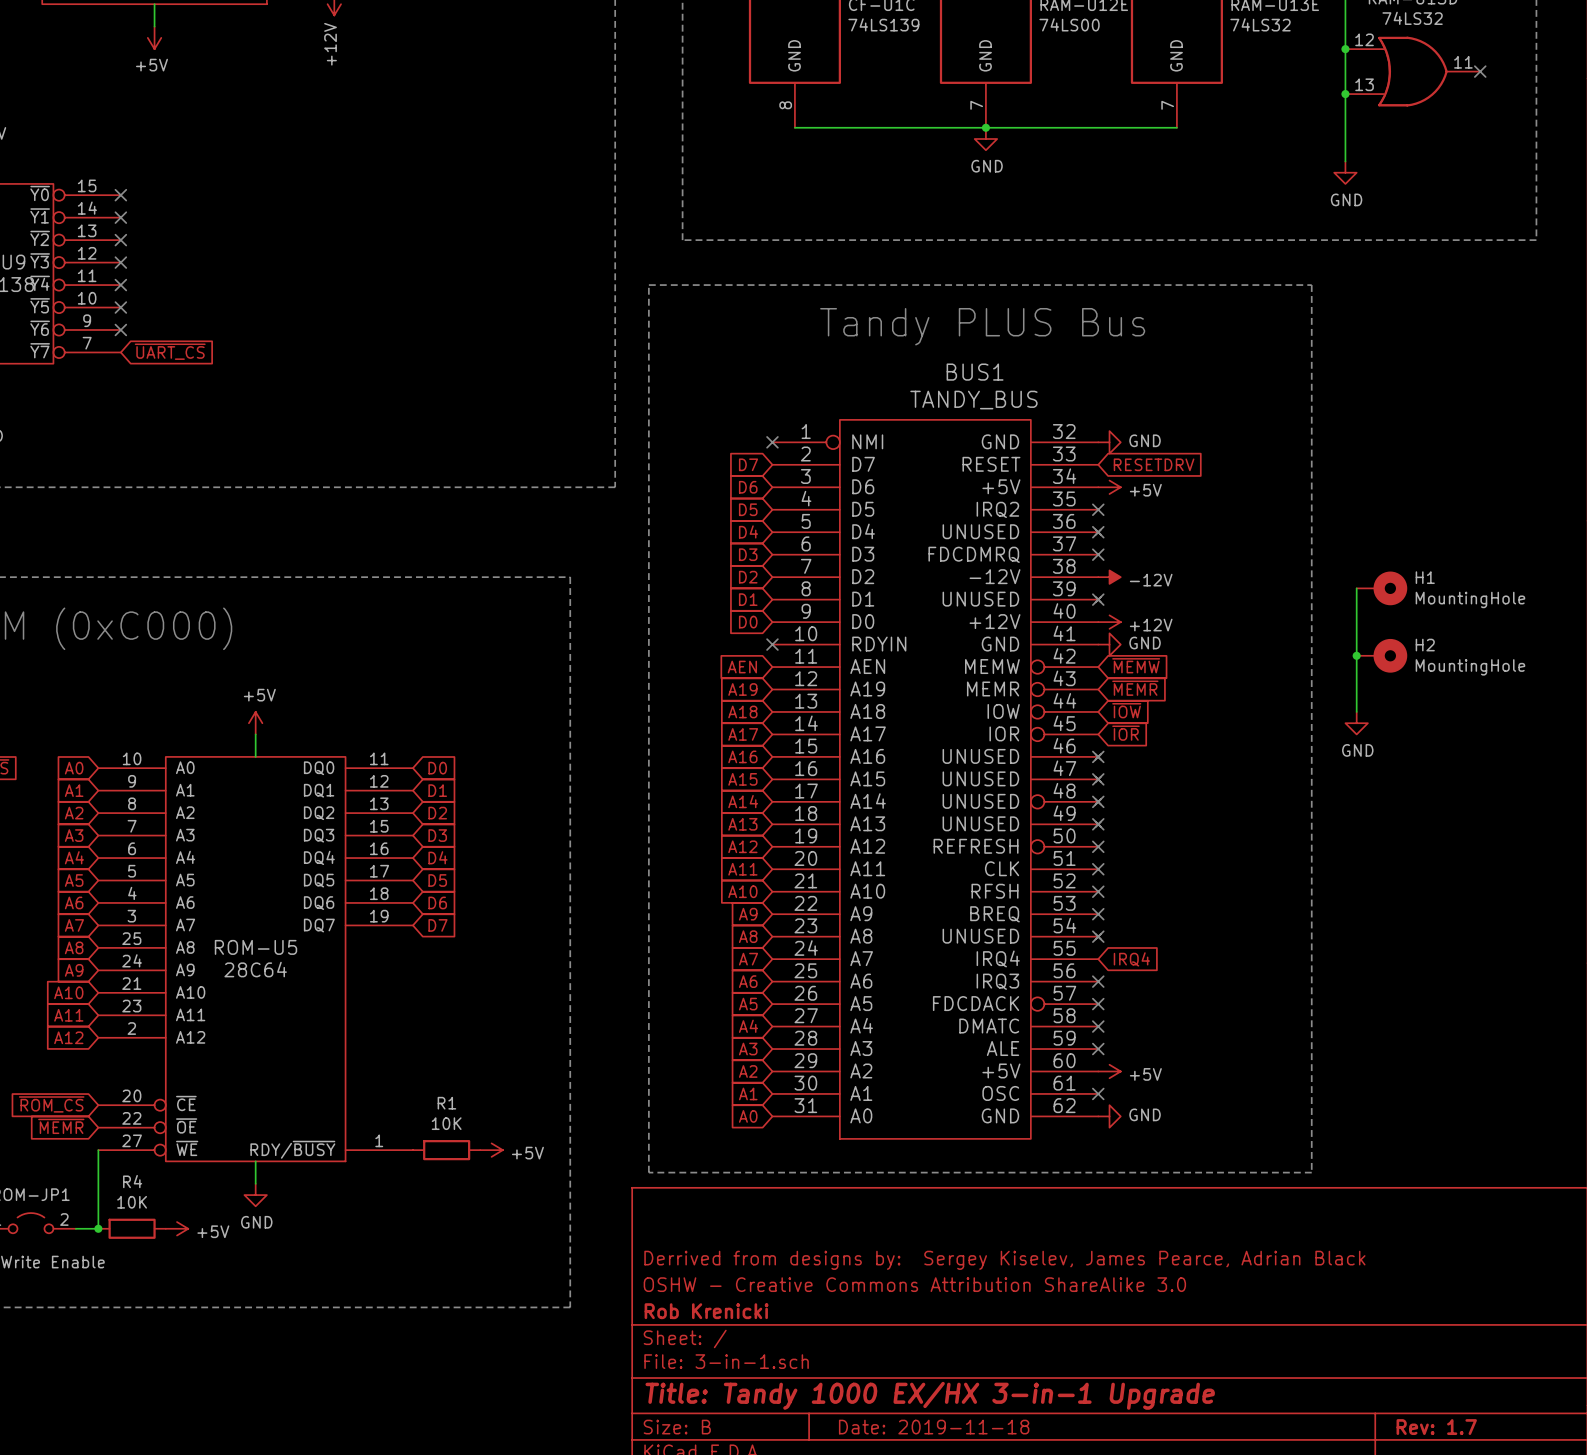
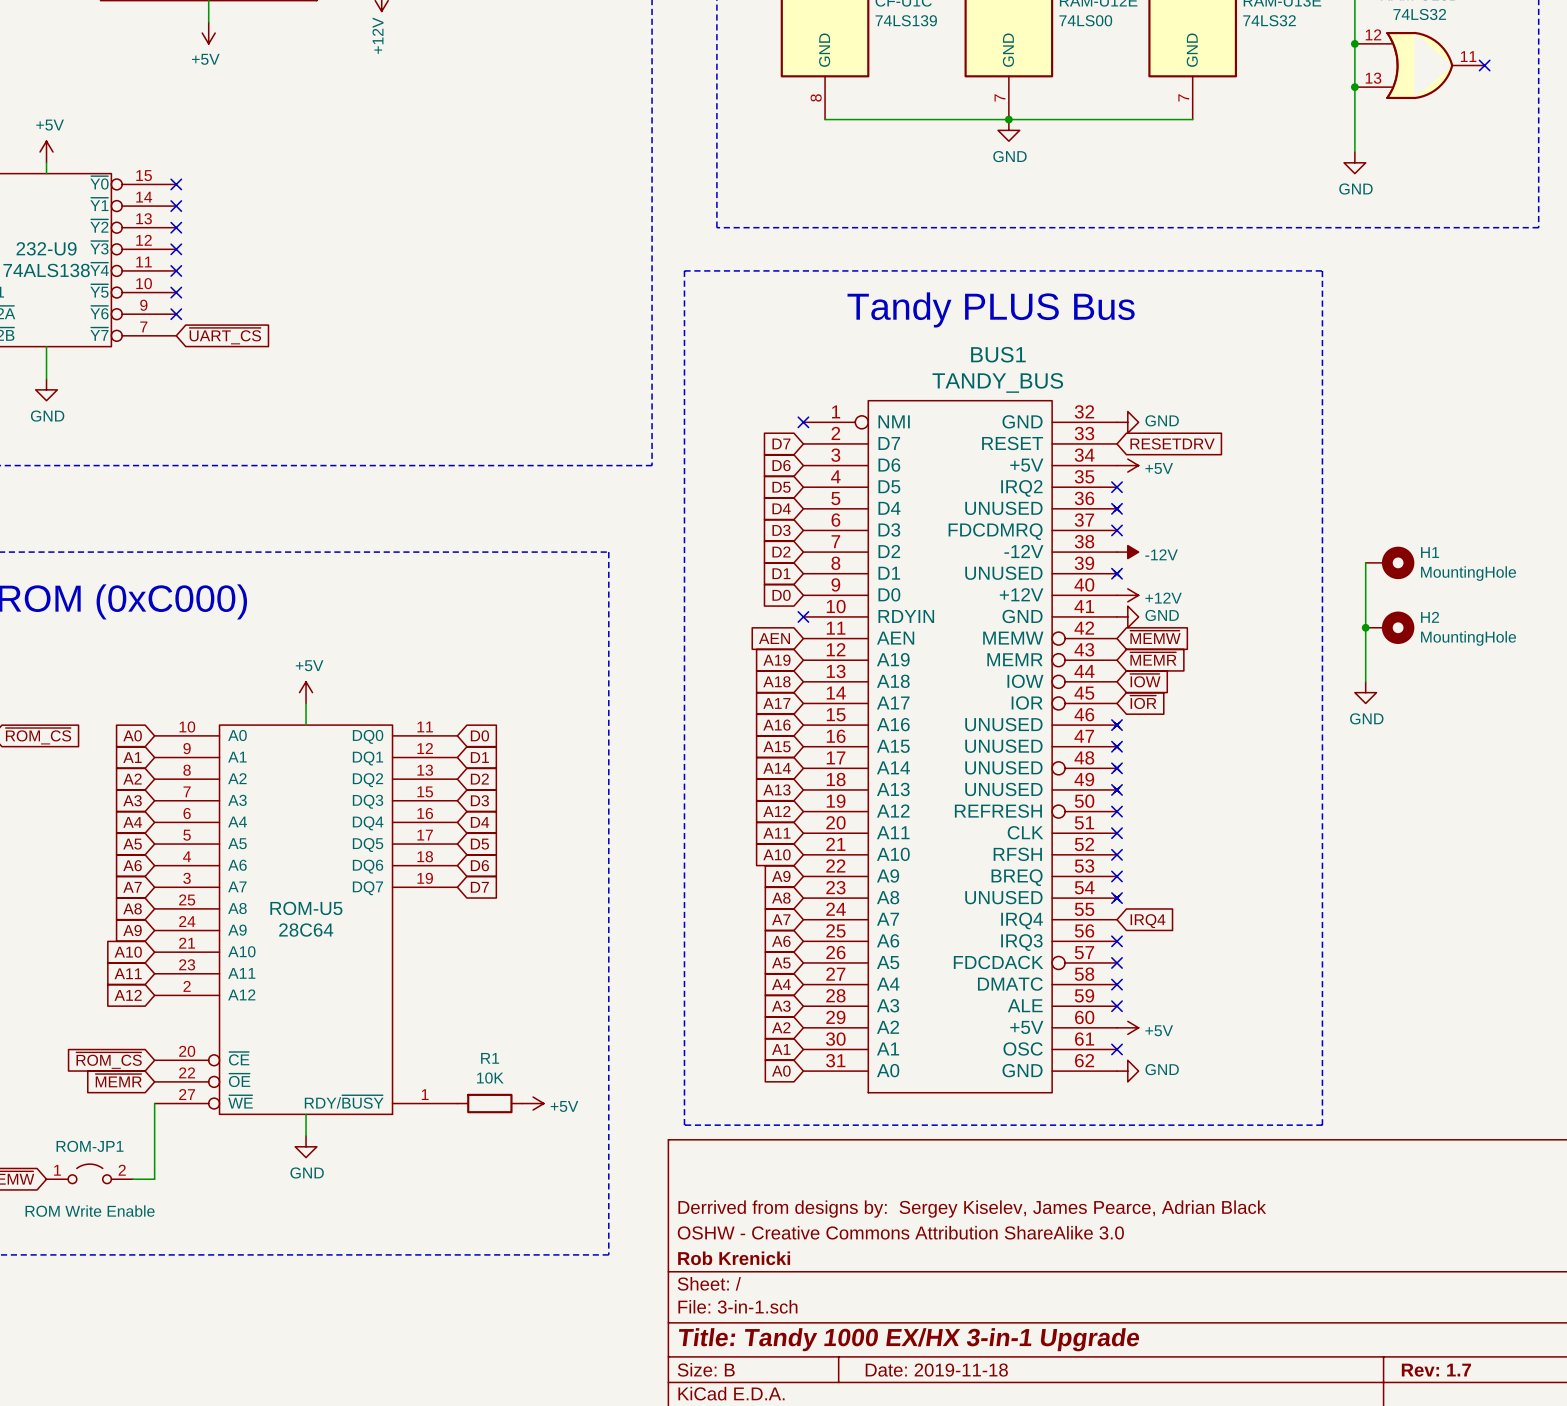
junction: (98, 1228) -> none
R4: 10K (132, 1228) -> none
power symbol: +5V (177, 1228) -> none

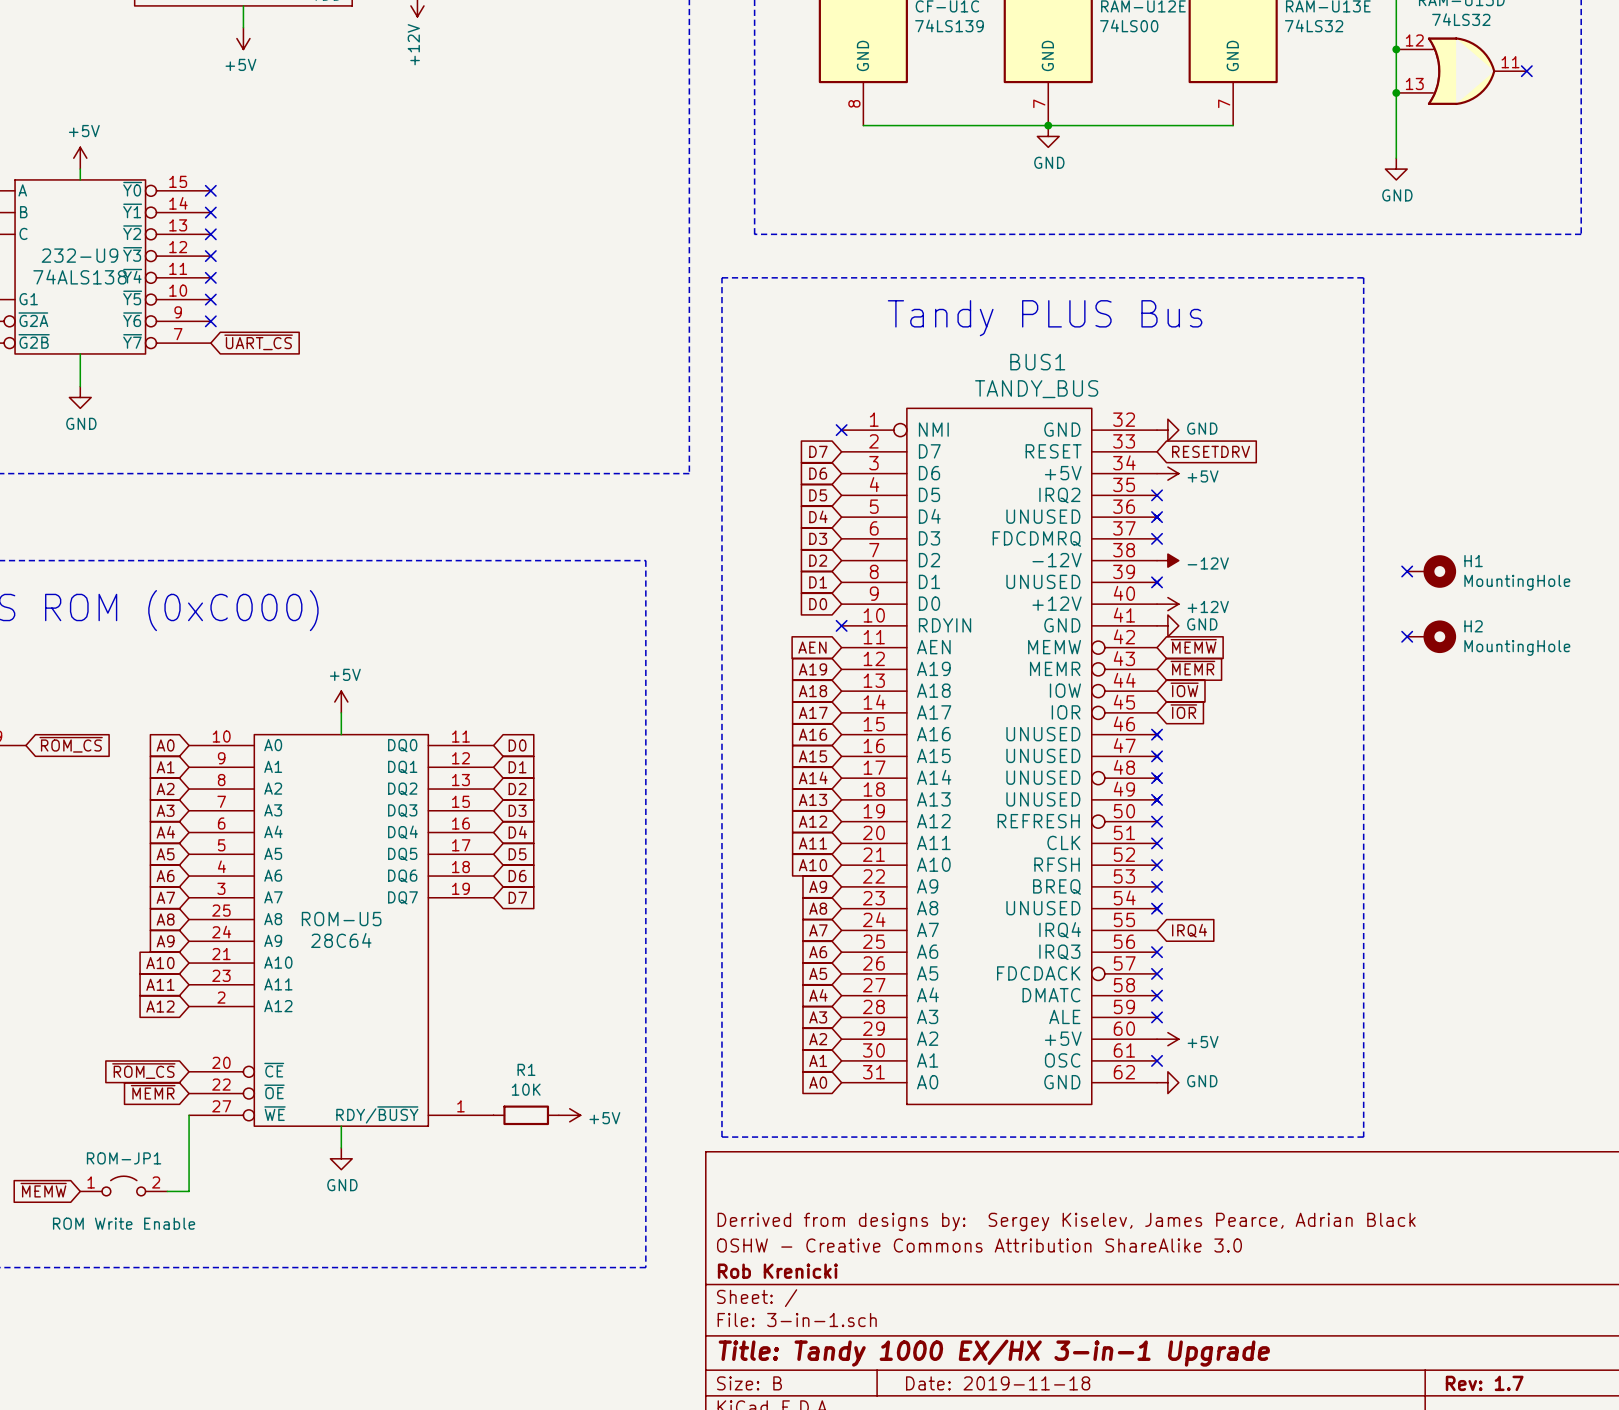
wire: (1365, 562) (1365, 681) -> none
no-connect mark: none -> (1407, 571)
junction: (1365, 627) -> none
no-connect mark: none -> (1407, 636)
power symbol: GND (1365, 692) -> none

